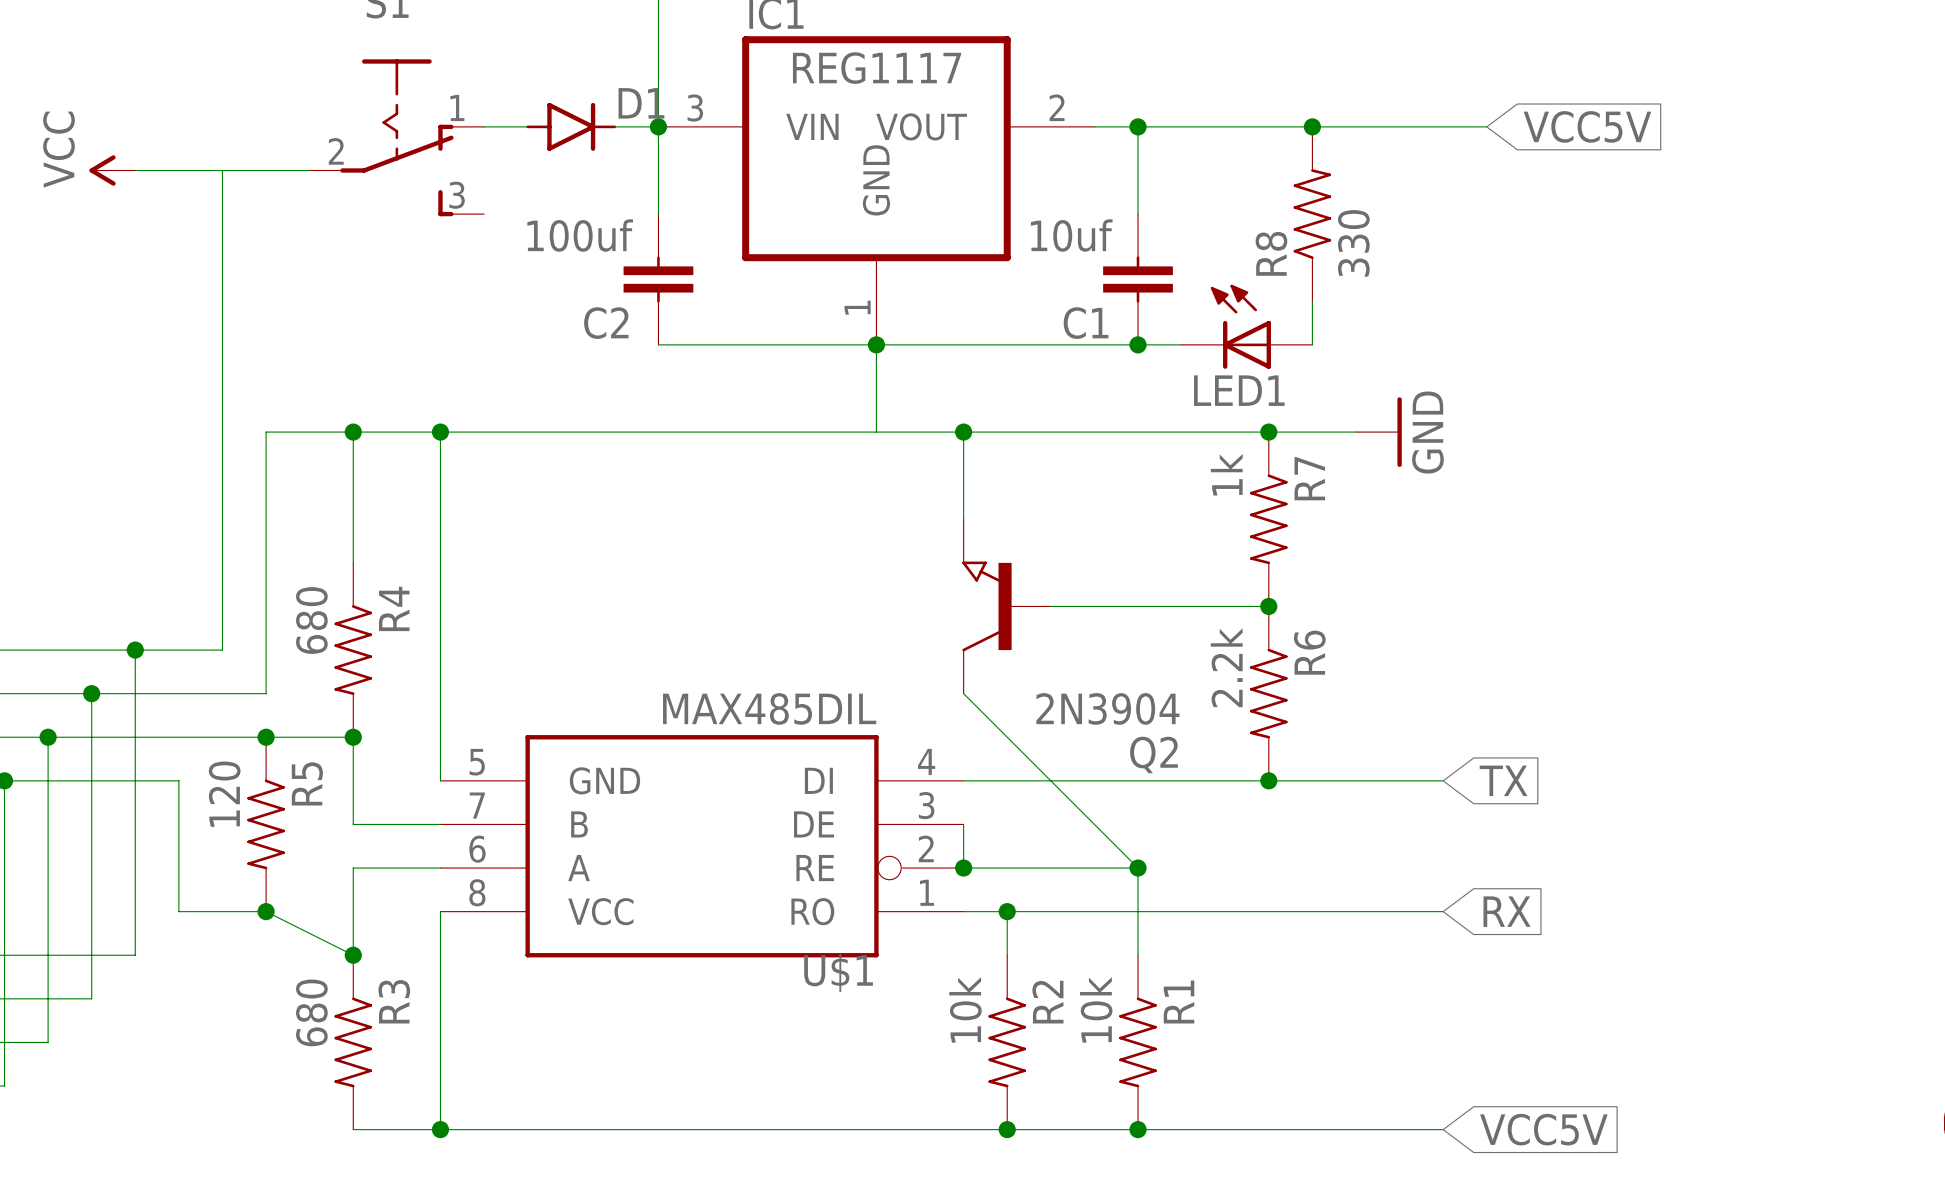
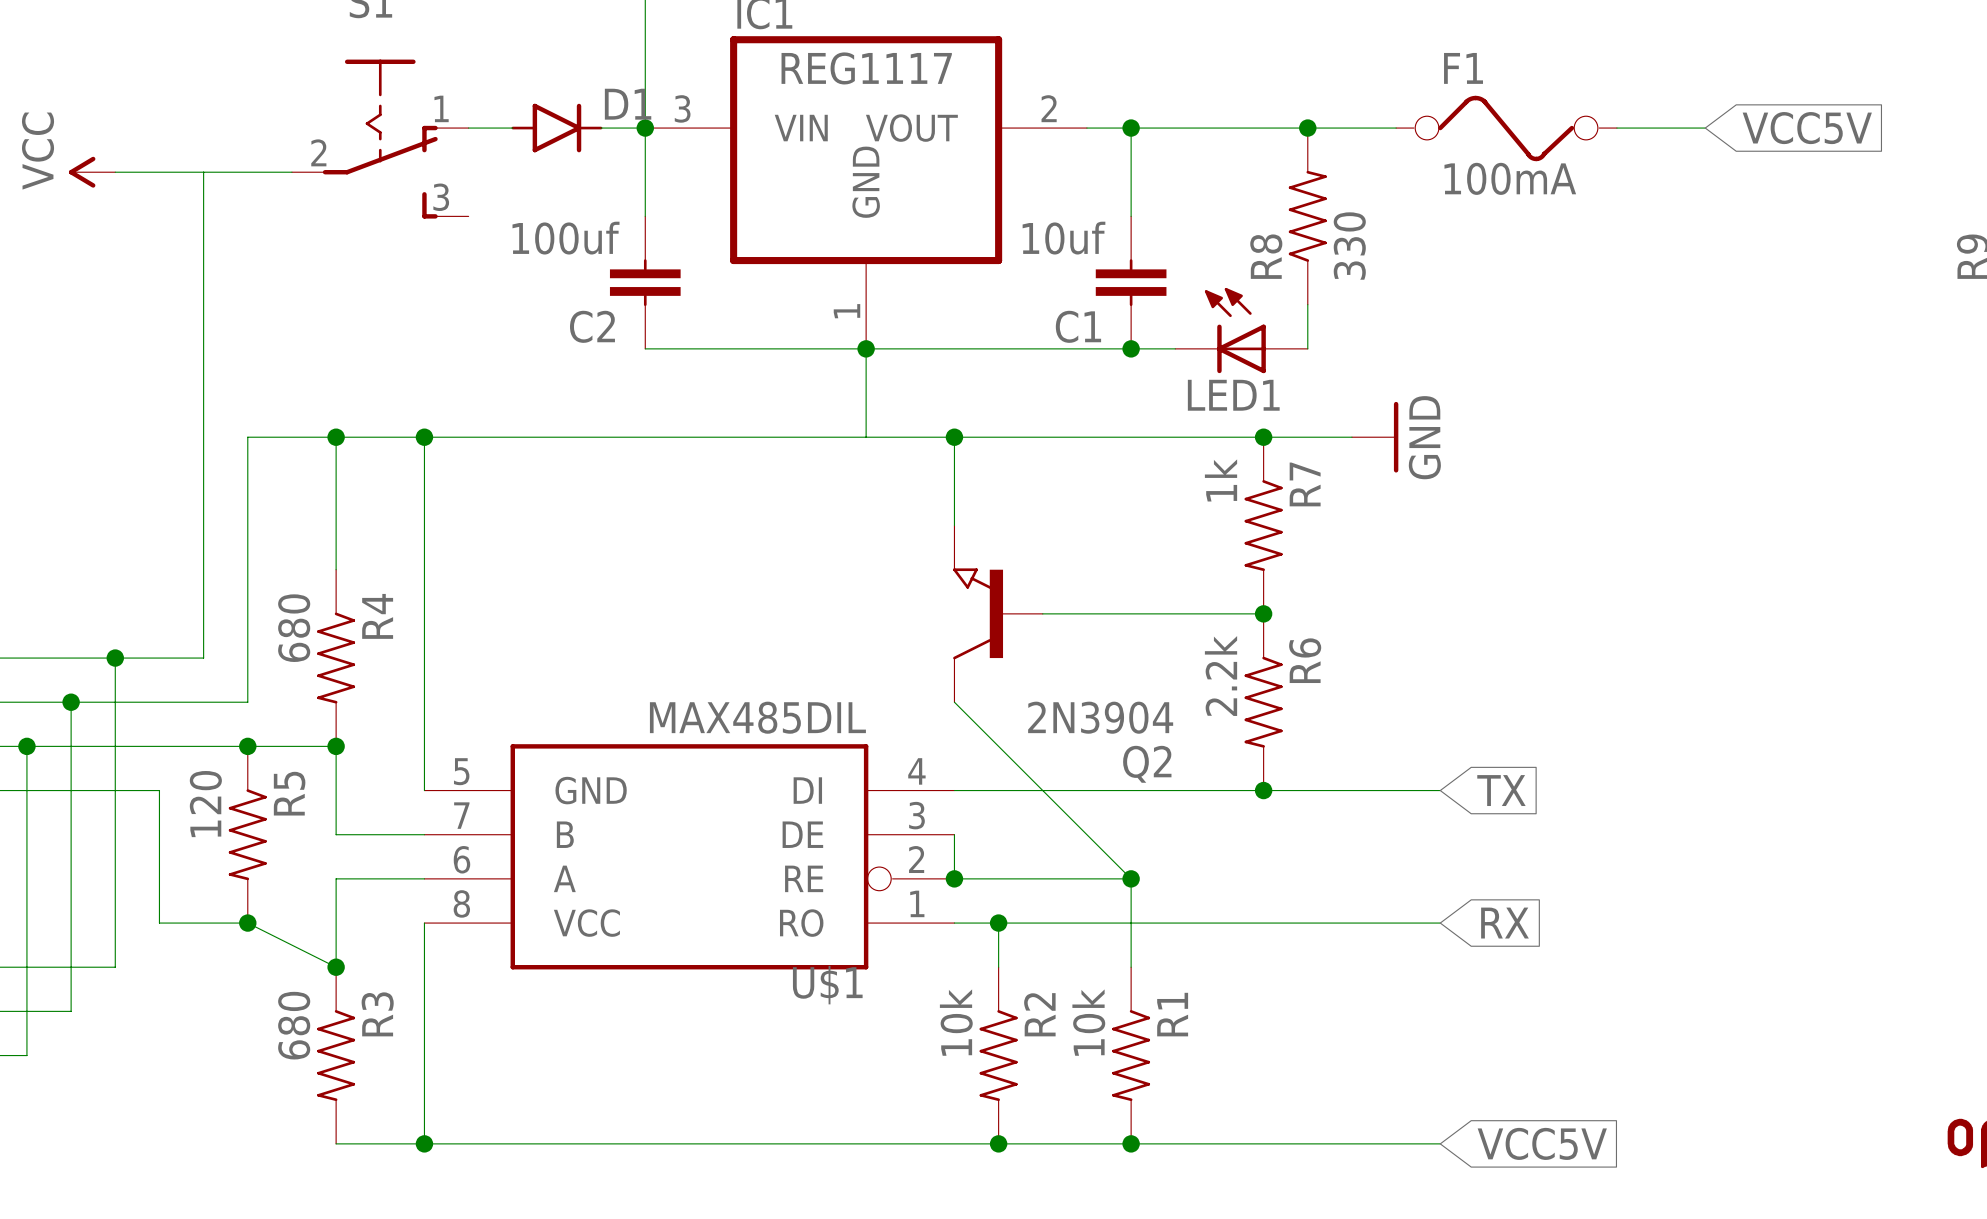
wire: (1399, 126) (1486, 126) -> (1616, 128) (1705, 128)
global label position: VCC5V (1587, 126) -> VCC5V (1807, 128)
F1: none -> 100mA (1506, 128)

